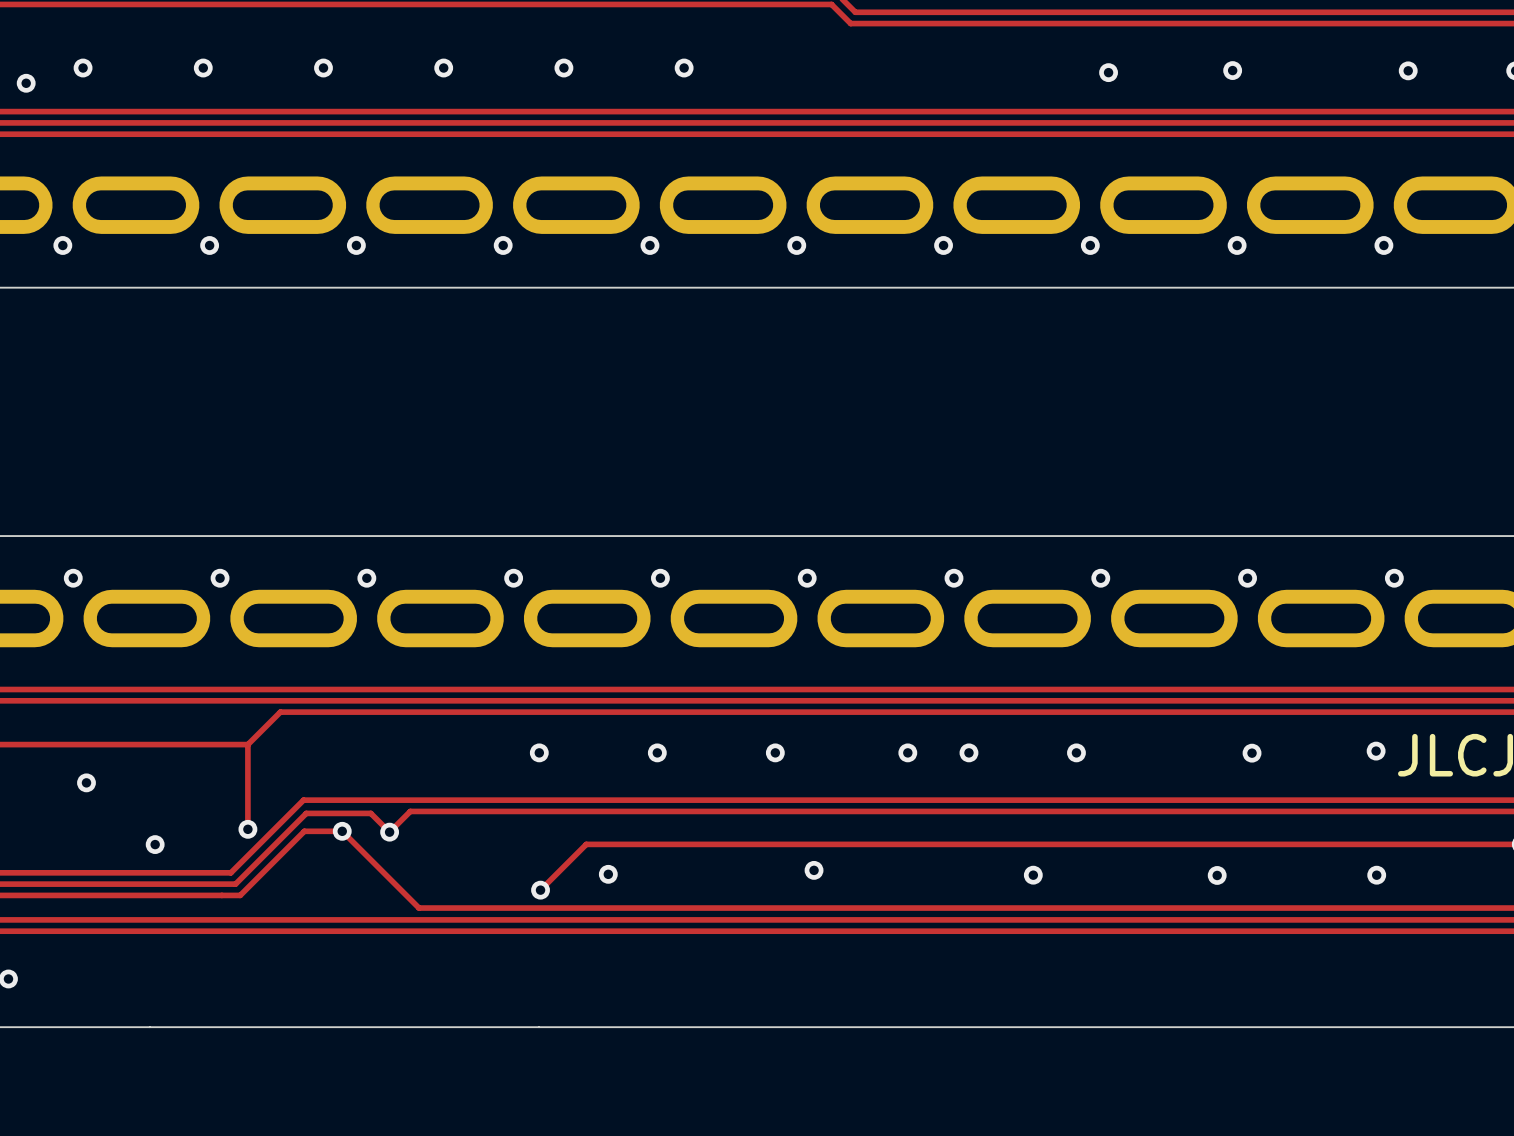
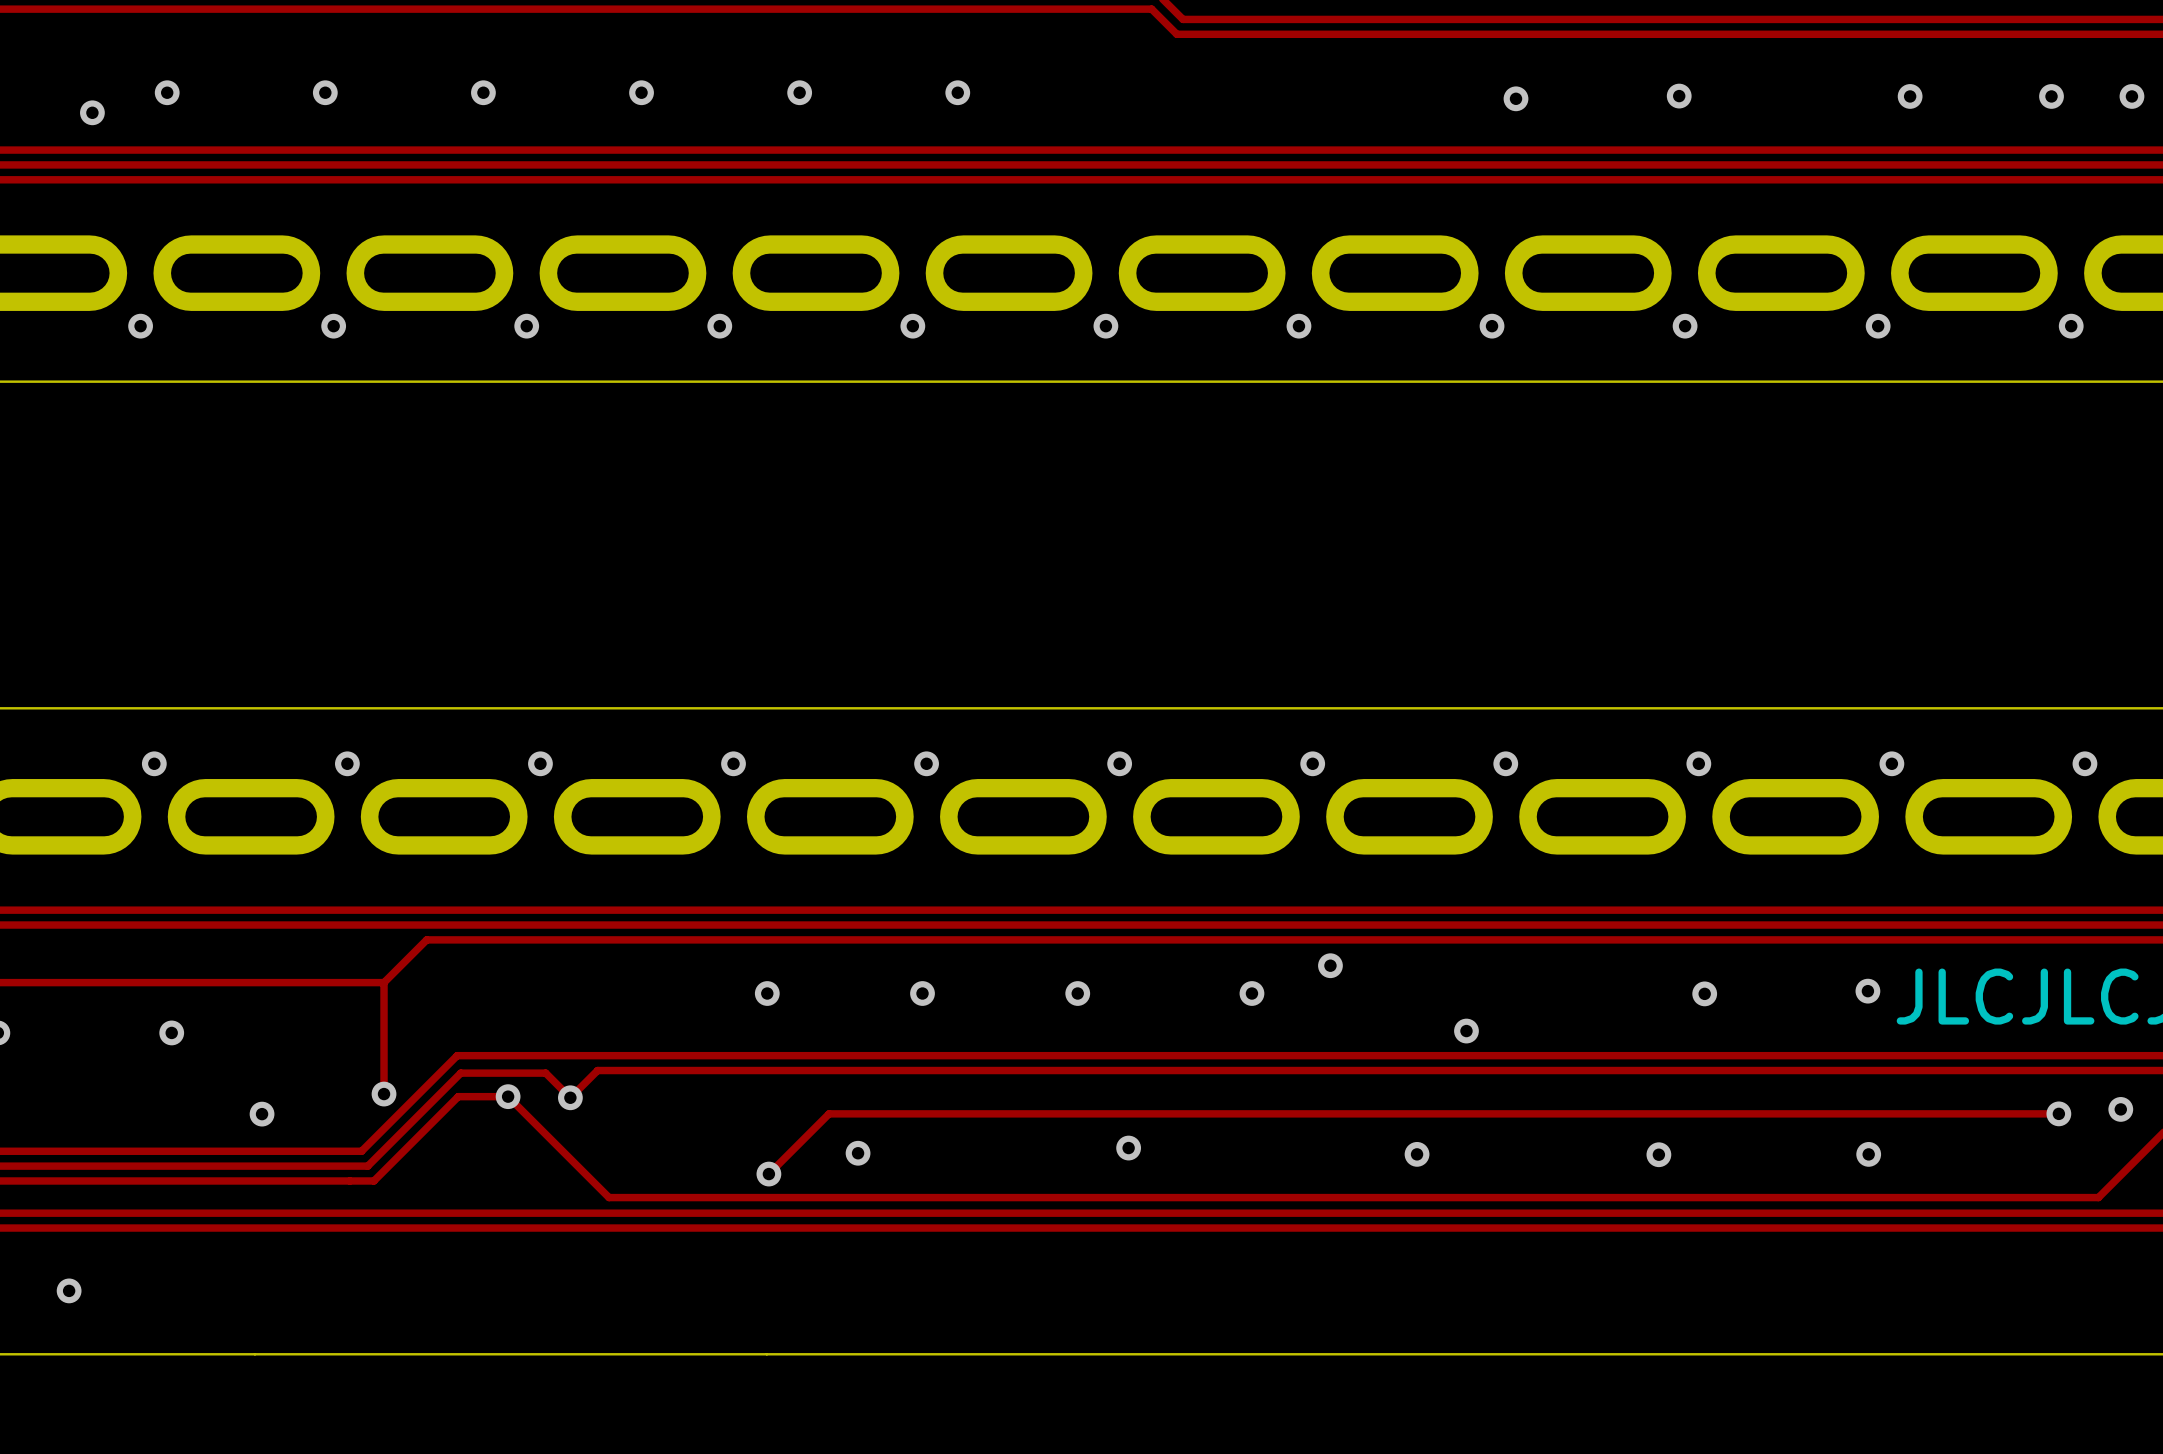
via position: (968, 752) -> (1330, 965)
via position: (1076, 752) -> (1466, 1031)

